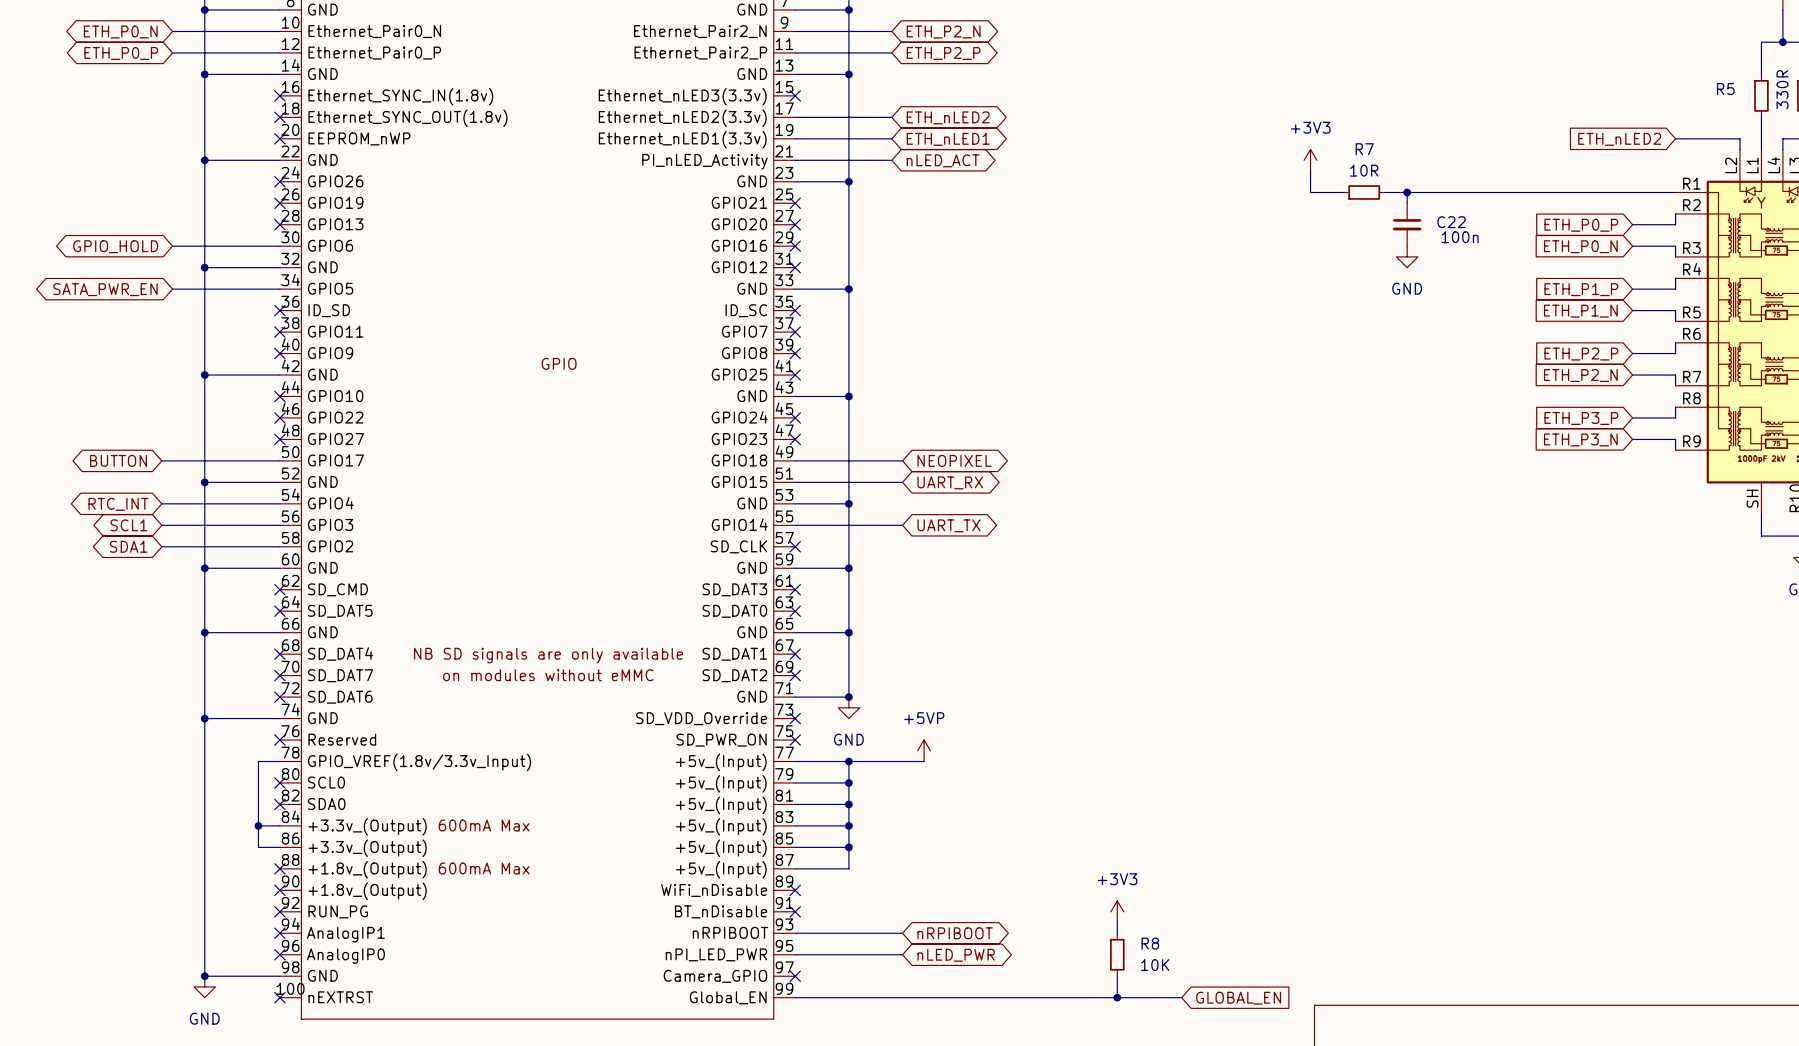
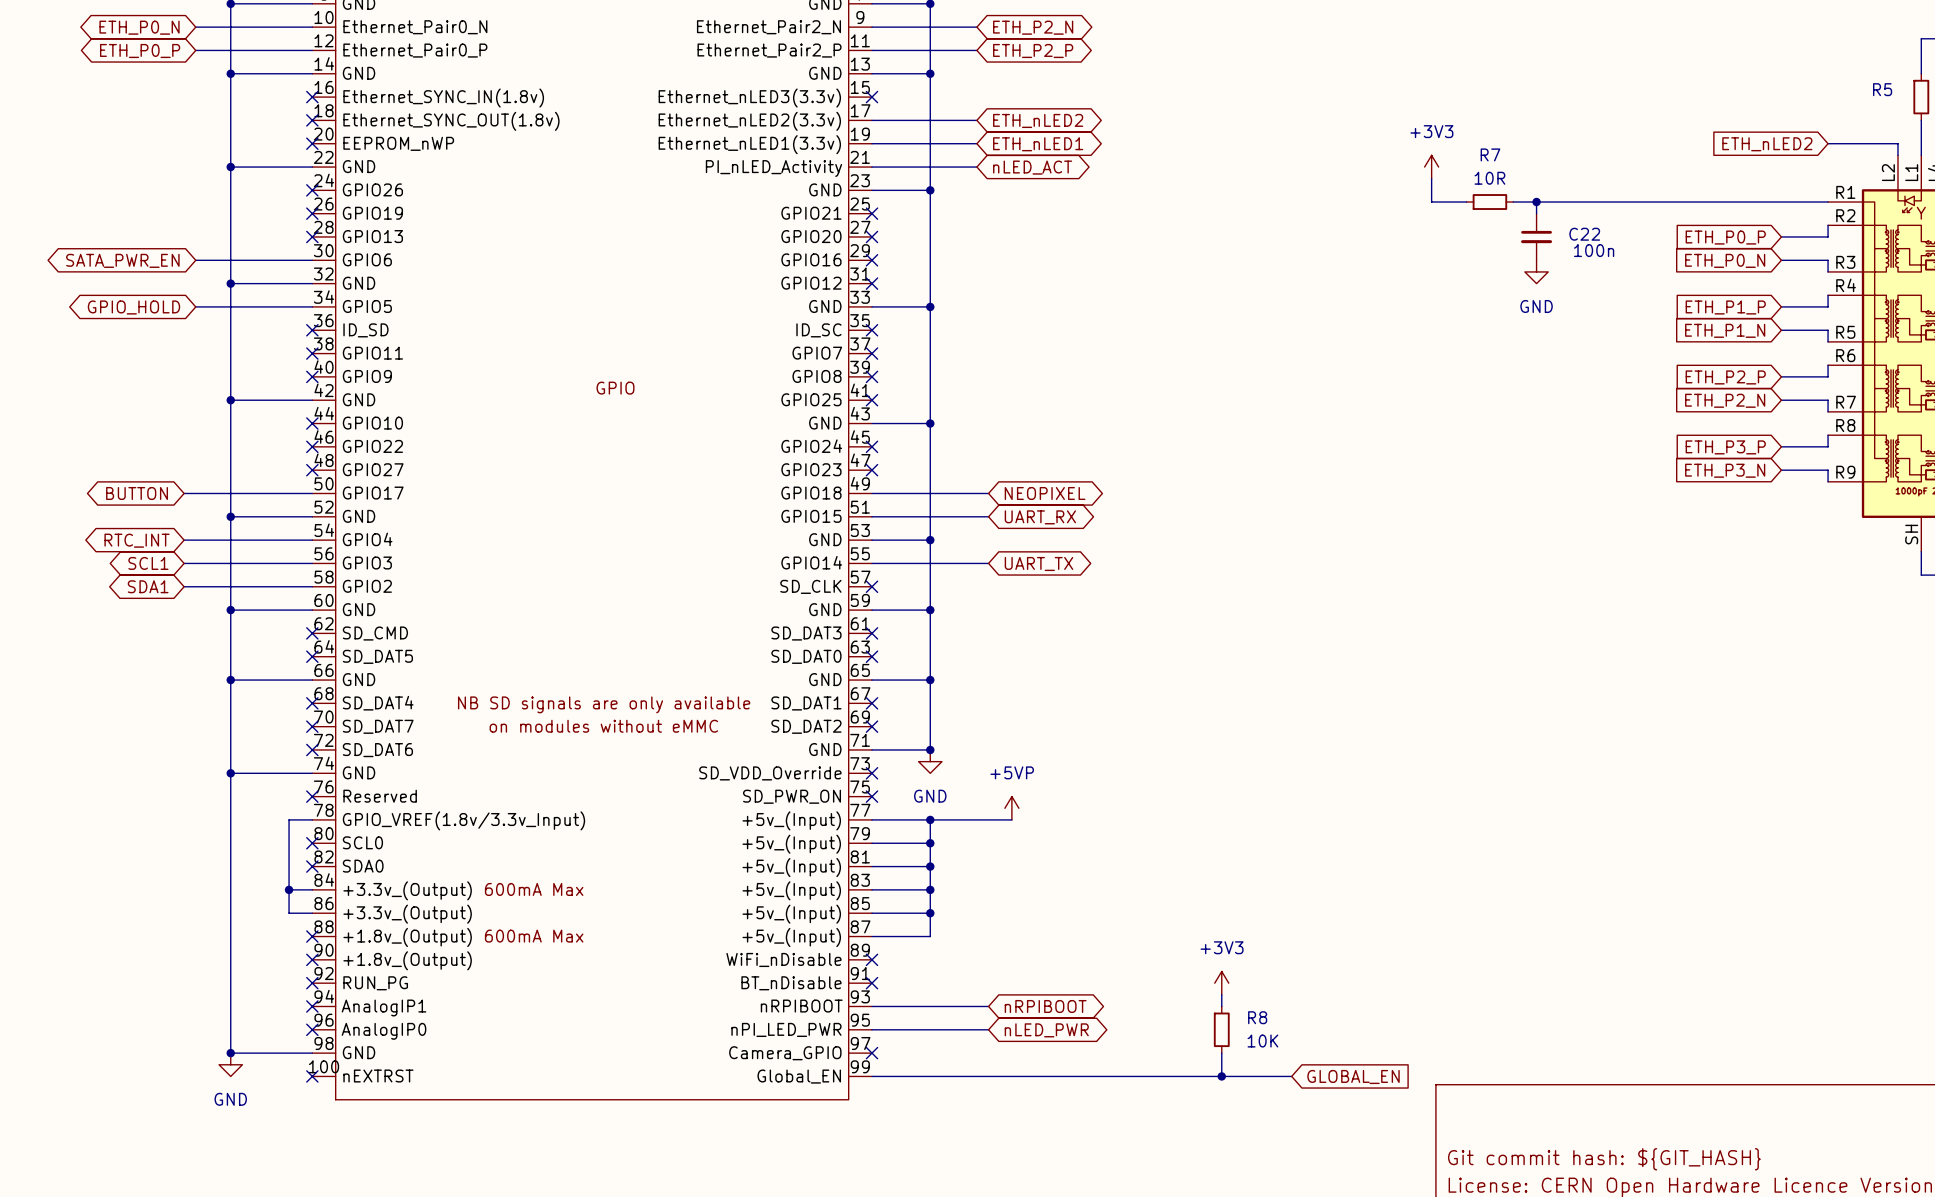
global label: GPIO_HOLD (115, 246) -> SATA_PWR_EN (122, 260)
global label: SATA_PWR_EN (105, 289) -> GPIO_HOLD (133, 307)

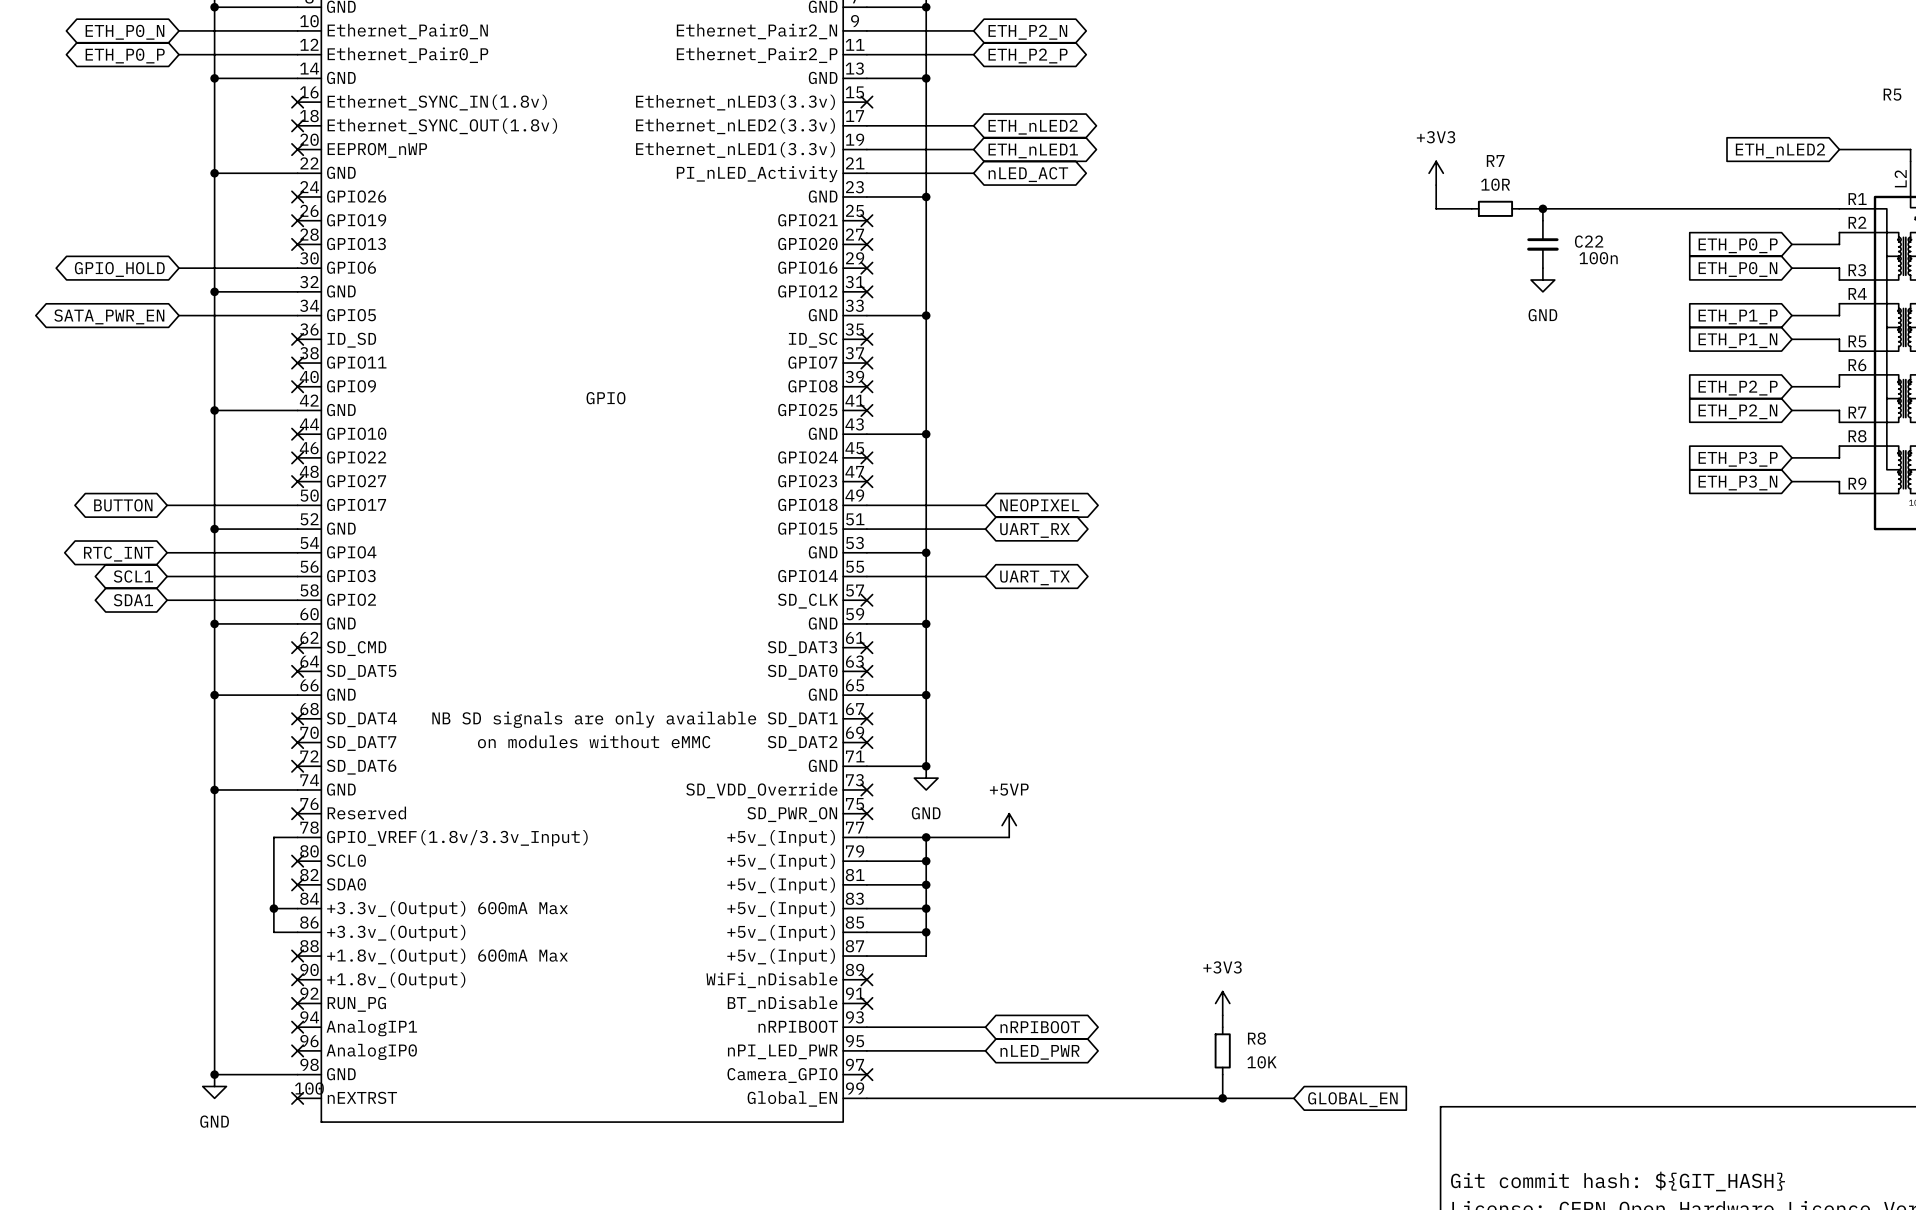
global label: SATA_PWR_EN (122, 260) -> GPIO_HOLD (119, 269)
global label: GPIO_HOLD (133, 307) -> SATA_PWR_EN (109, 316)

